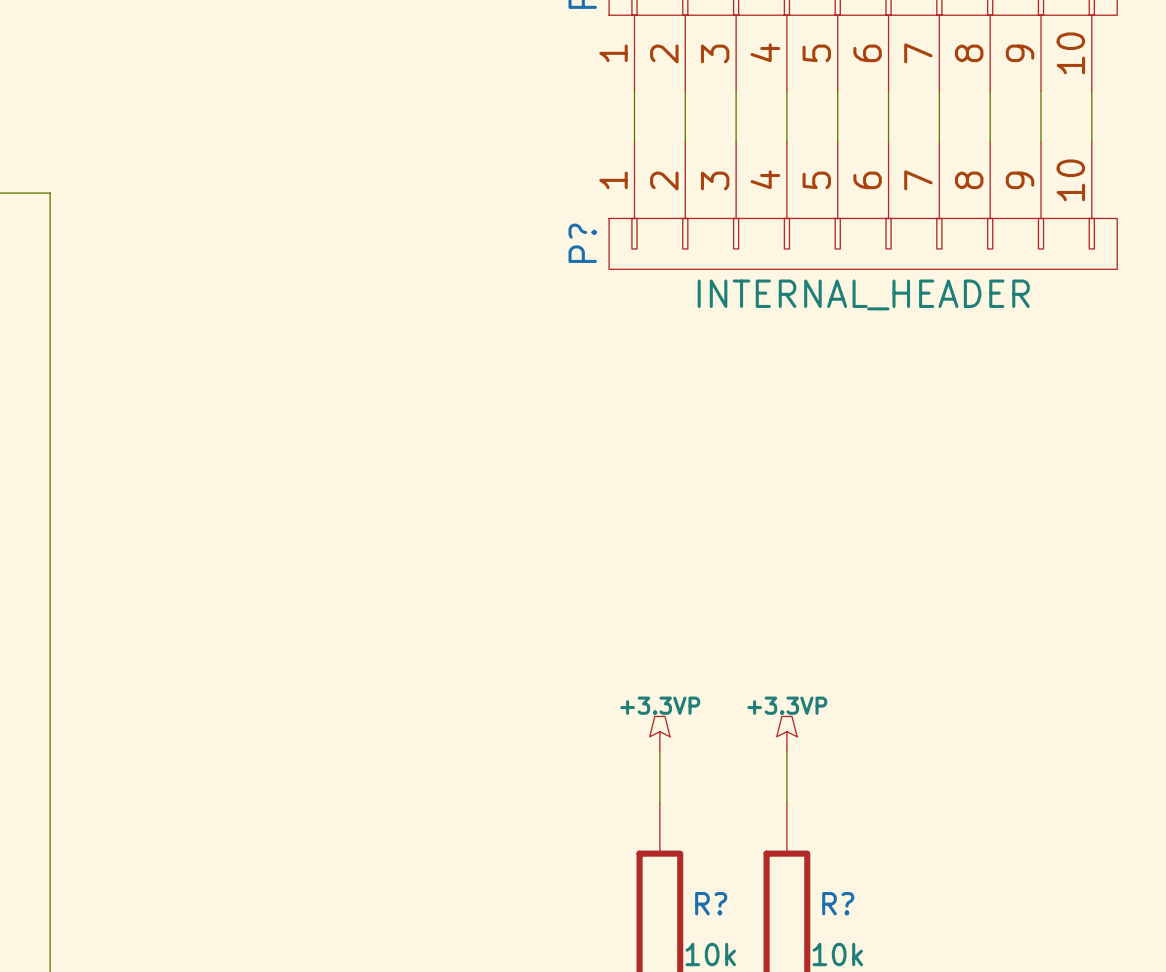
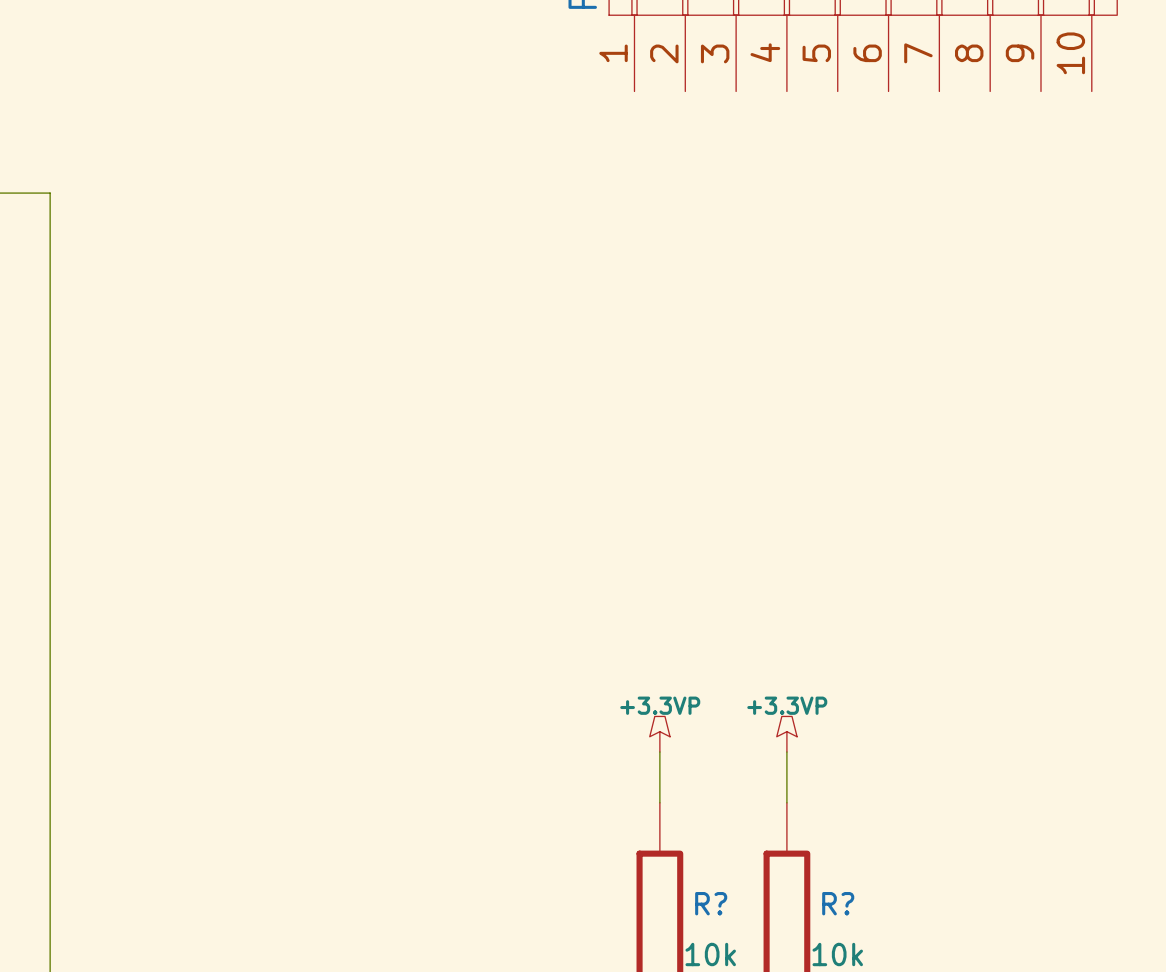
wire: (634, 91) (634, 142) -> none
wire: (685, 91) (685, 142) -> none
wire: (736, 91) (736, 142) -> none
wire: (786, 91) (786, 142) -> none
wire: (837, 91) (837, 142) -> none
wire: (888, 91) (888, 142) -> none
wire: (939, 91) (939, 142) -> none
wire: (990, 91) (990, 142) -> none
wire: (1040, 91) (1040, 142) -> none
wire: (1091, 91) (1091, 142) -> none
P?: INTERNAL_HEADER (863, 205) -> none

